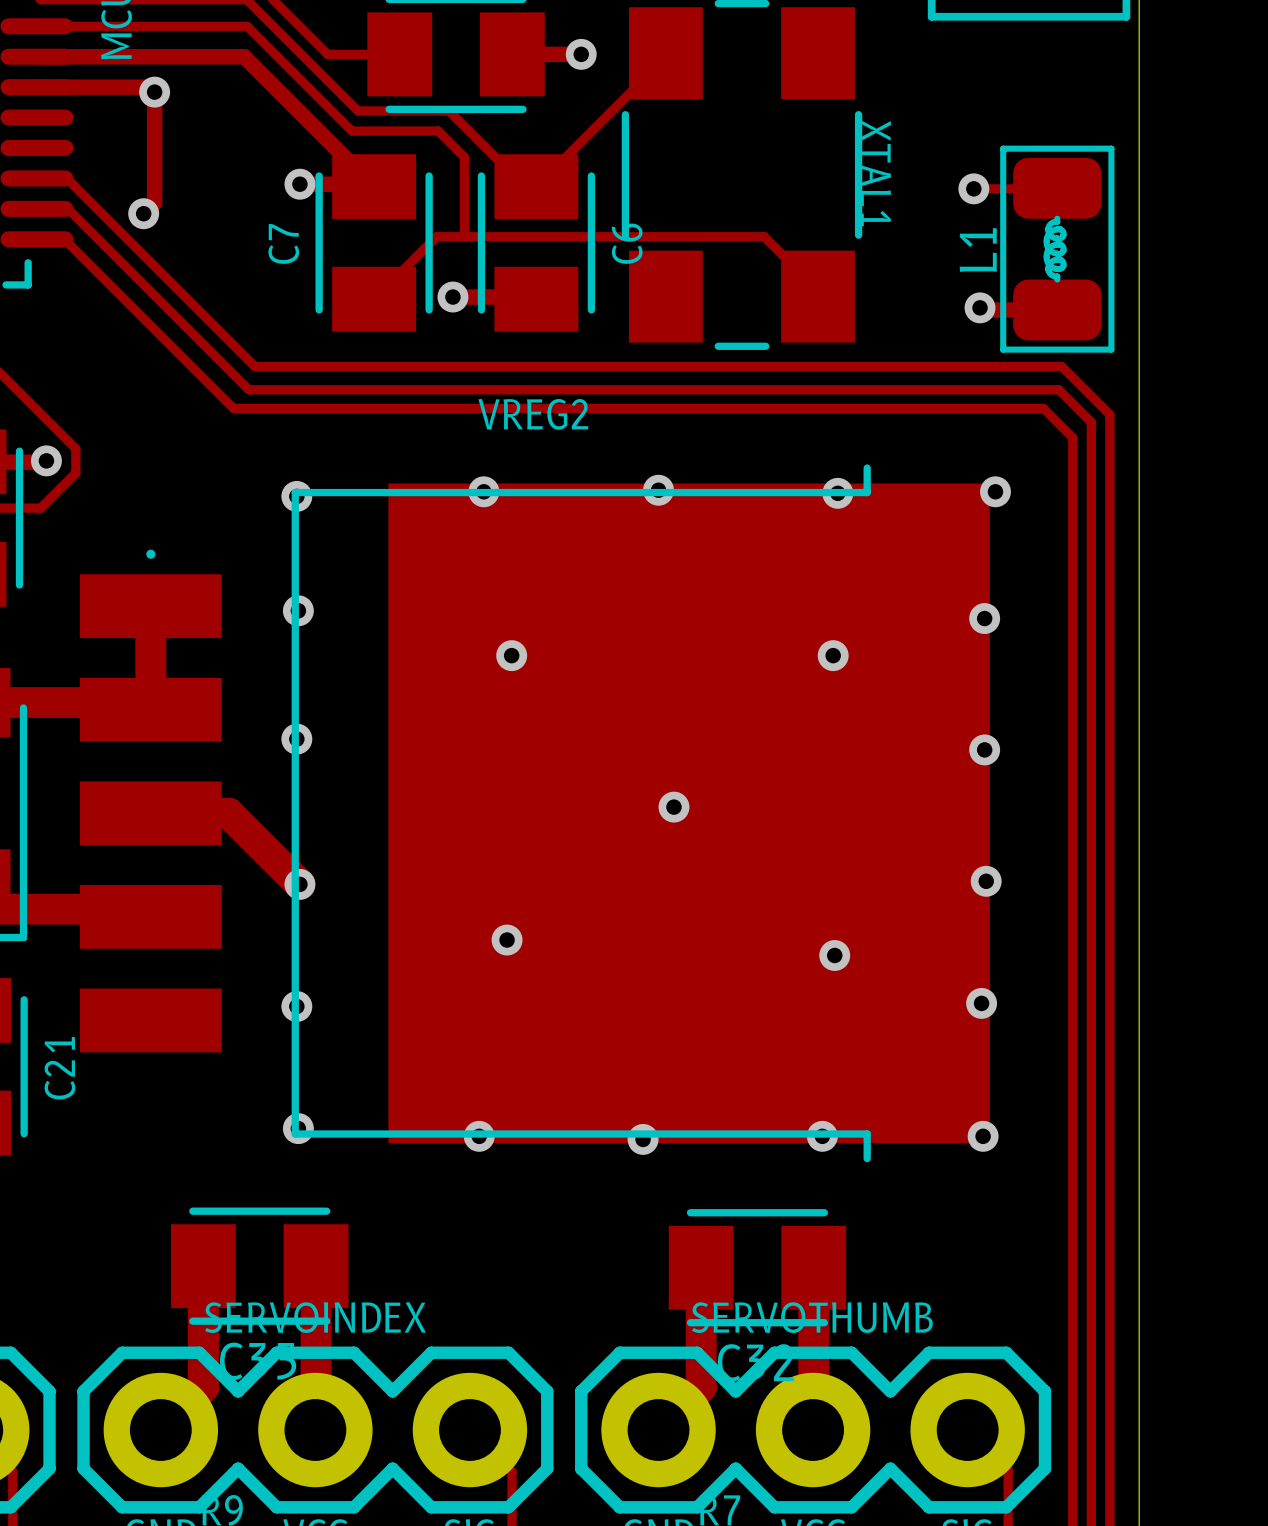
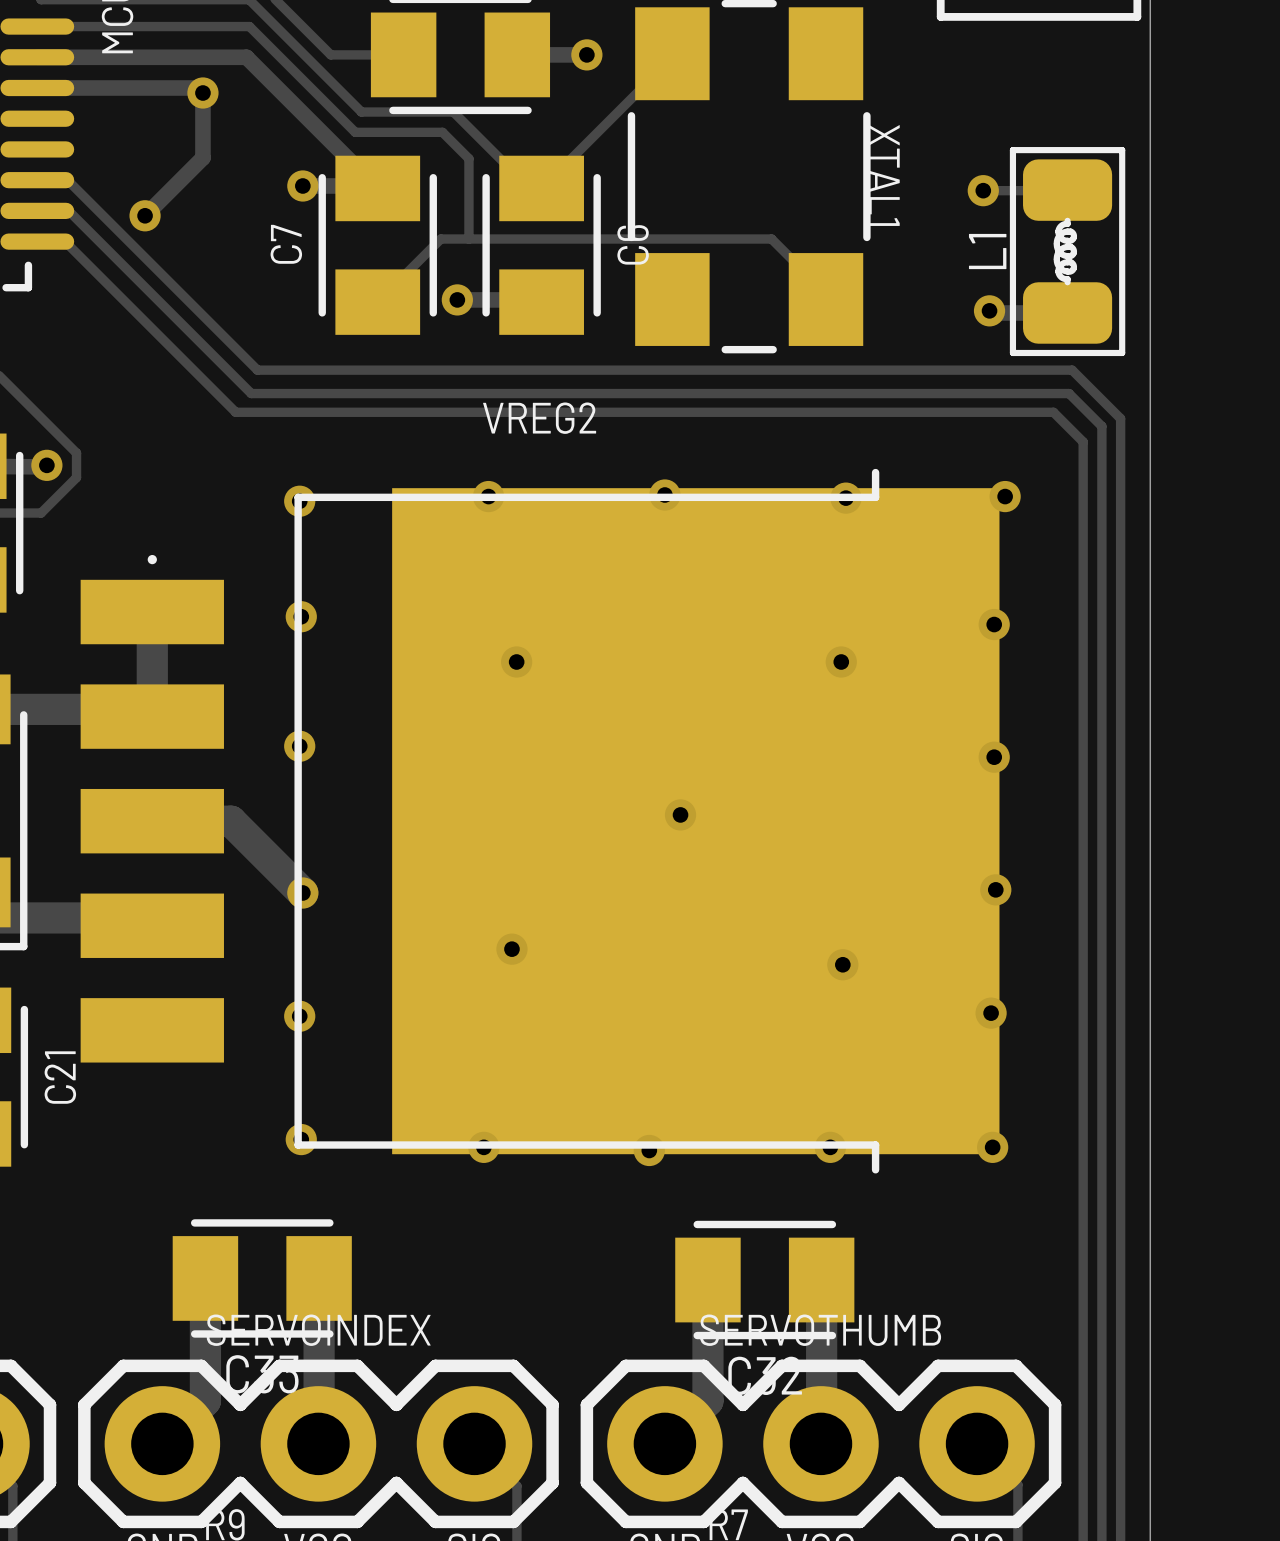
track: (149, 87) (154, 92) (154, 202) -> (151, 88) (197, 88) (202, 93) (202, 157) (156, 204)
via position: (154, 92) -> (202, 93)

